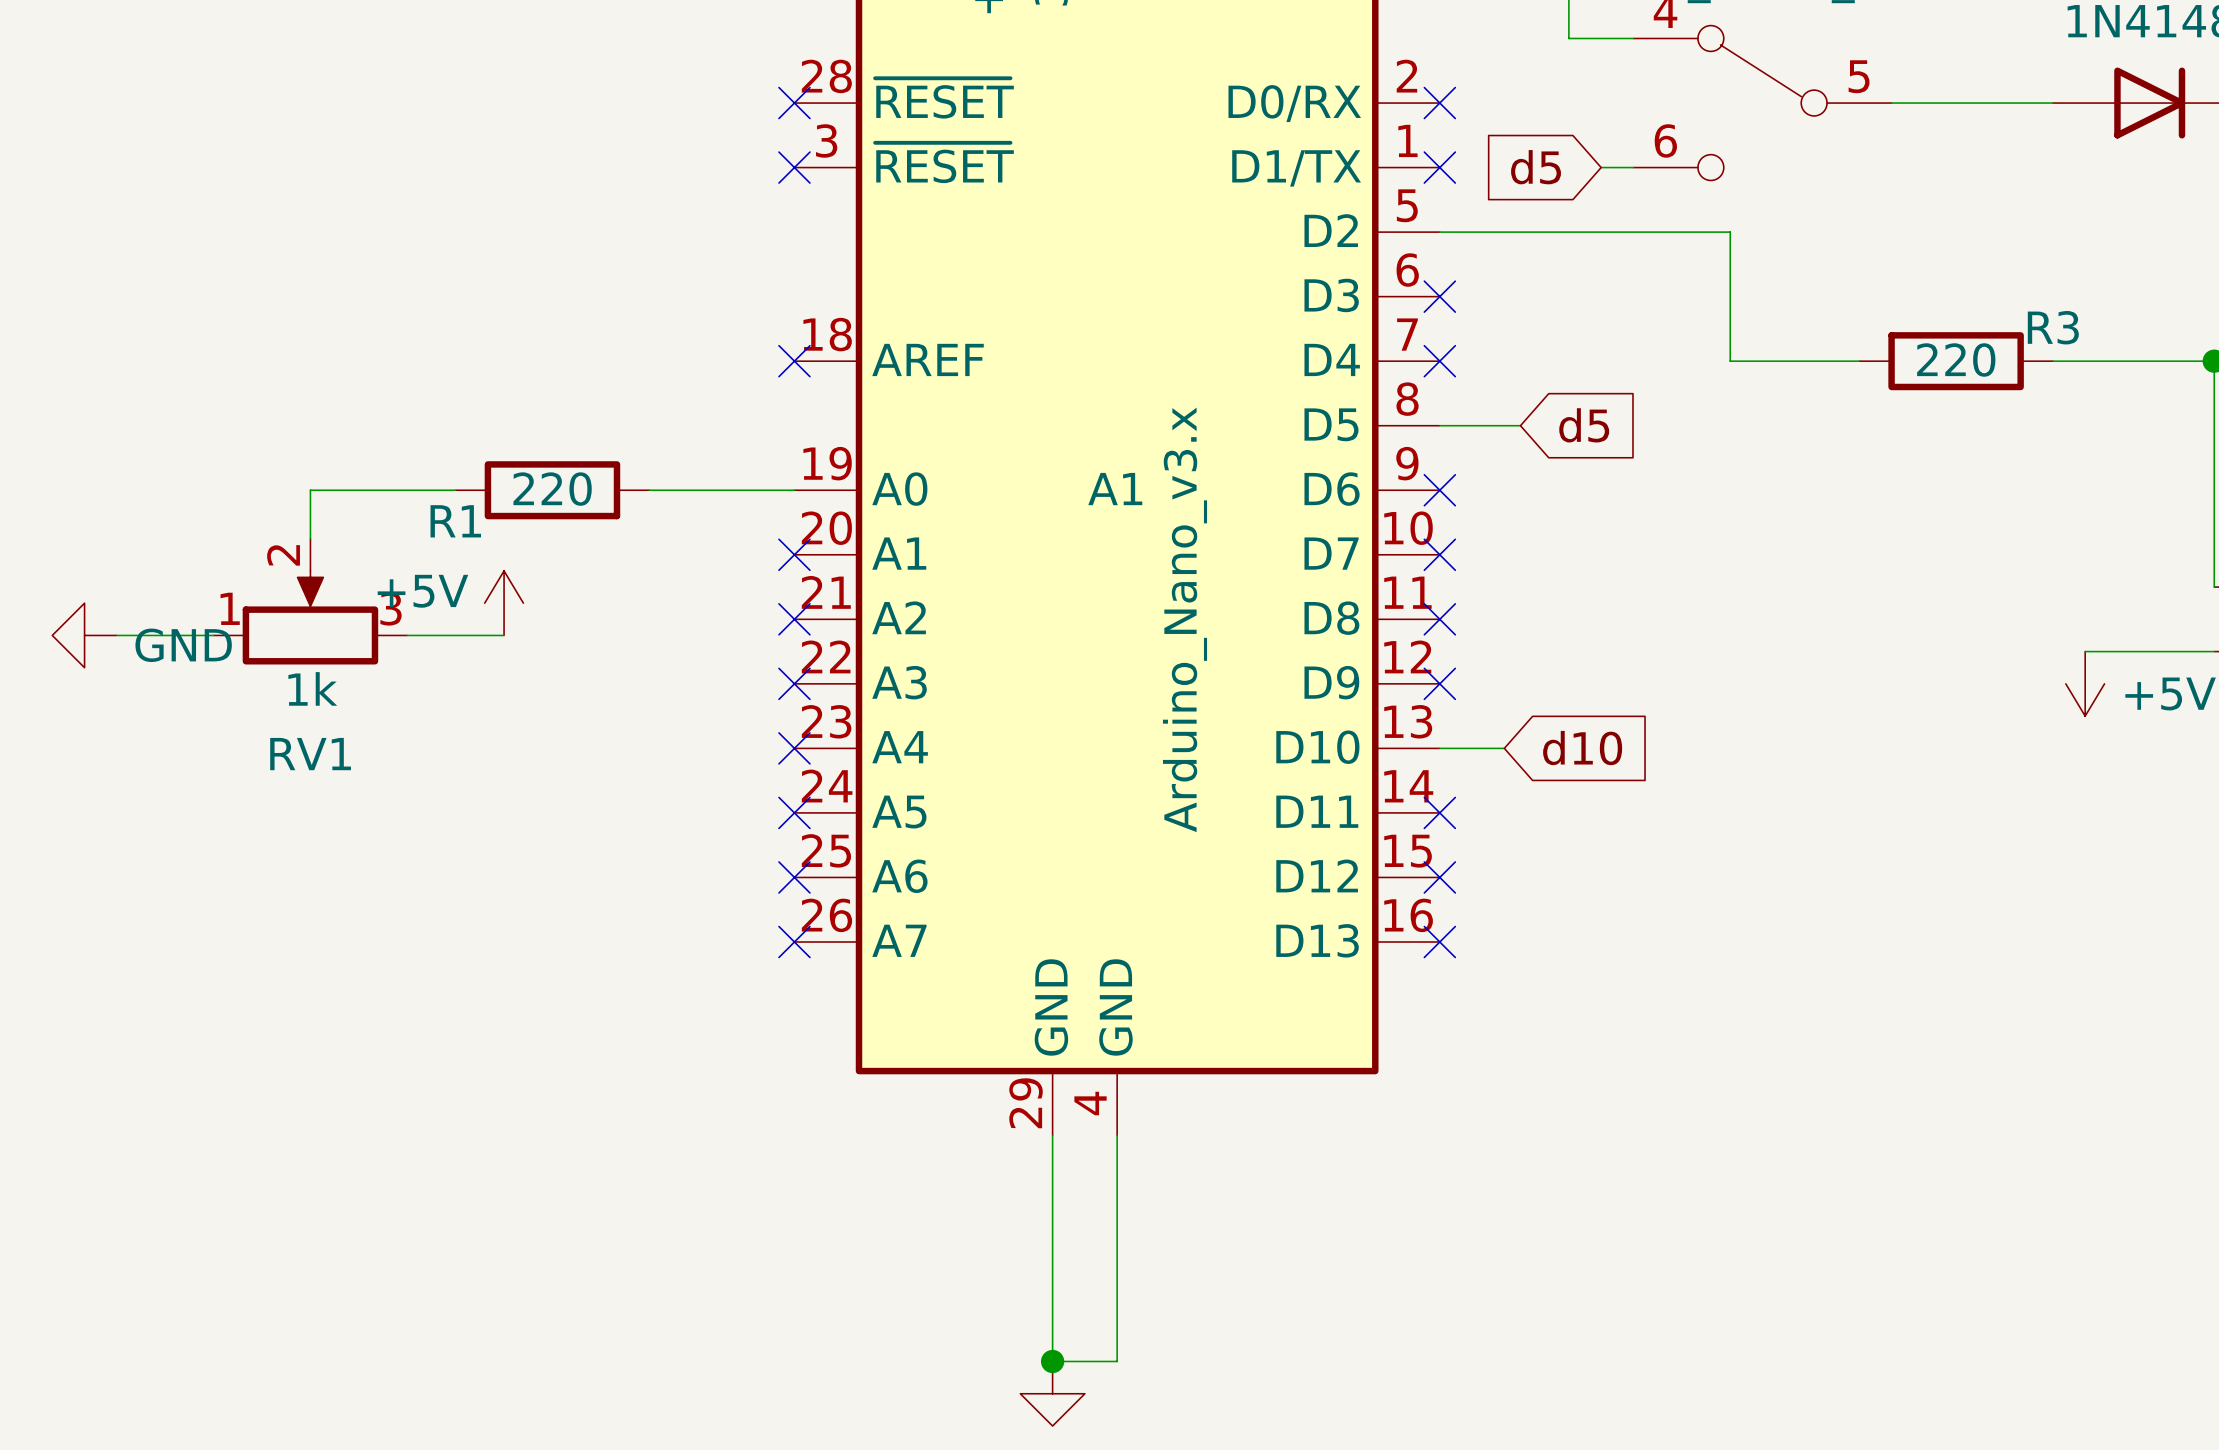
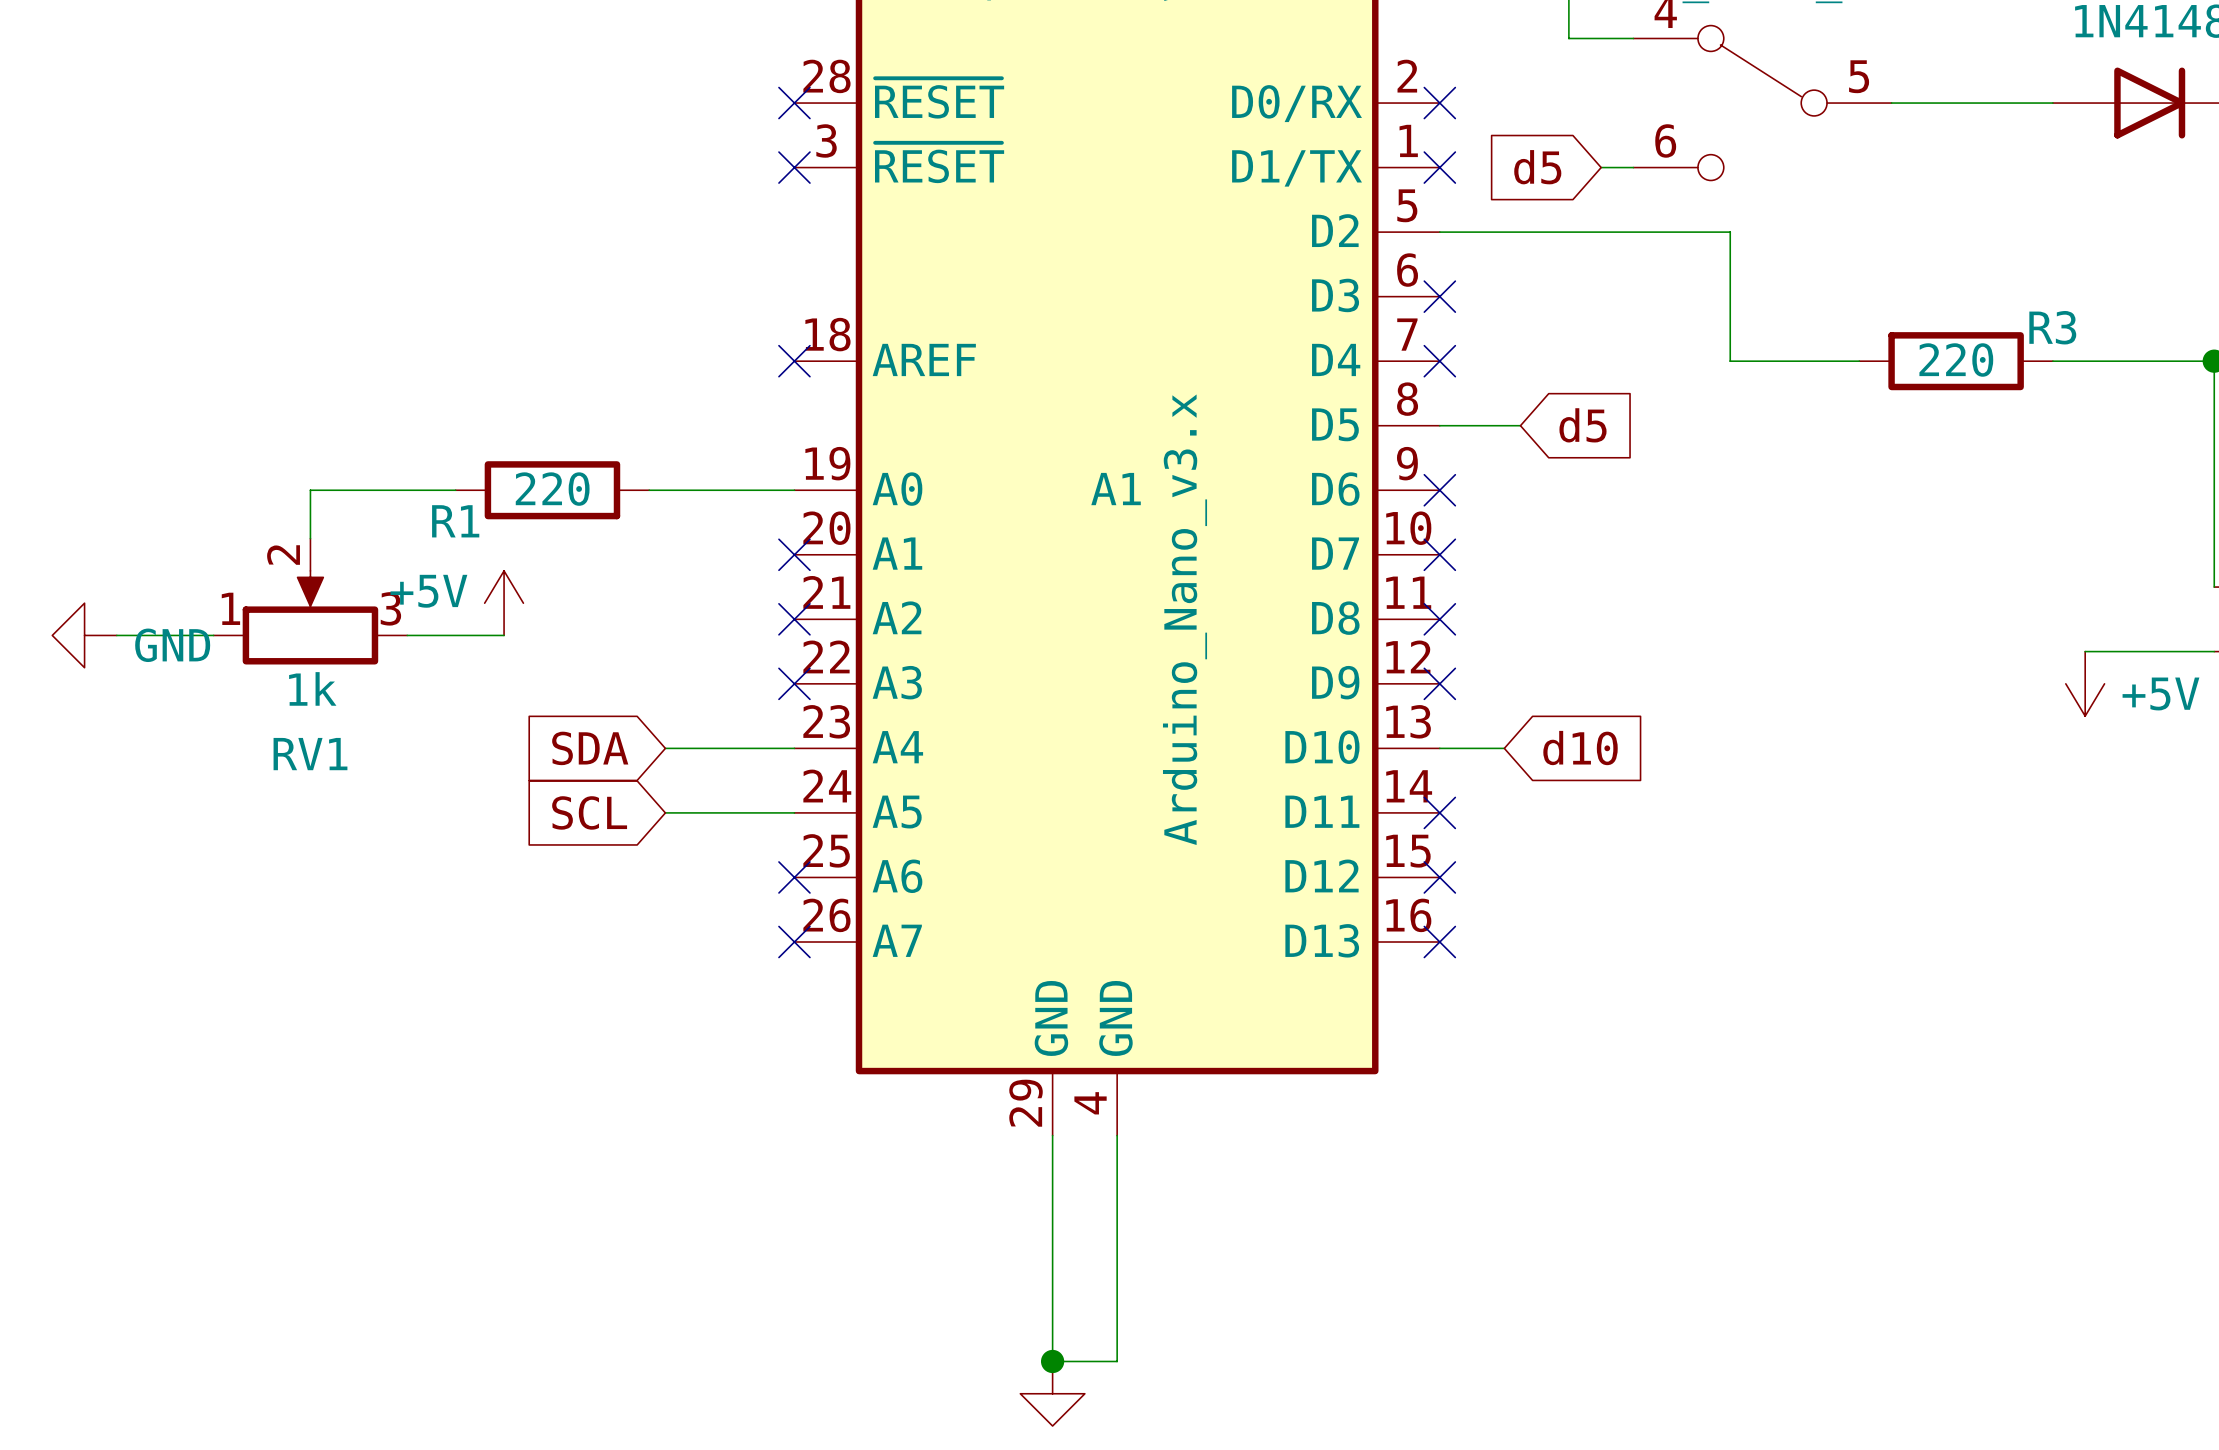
global label: none -> SDA (590, 748)
wire: none -> (665, 748) (794, 748)
no-connect mark: (794, 748) -> none
global label: none -> SCL (589, 812)
wire: none -> (665, 812) (794, 812)
no-connect mark: (794, 812) -> none

